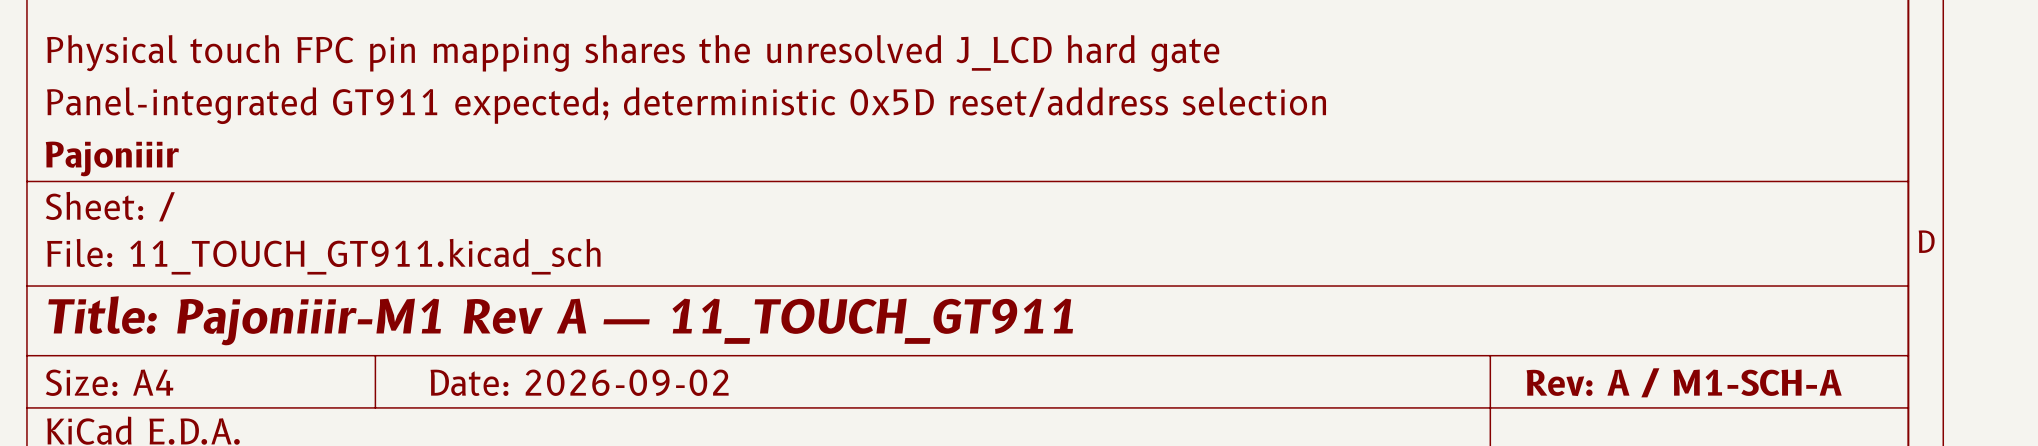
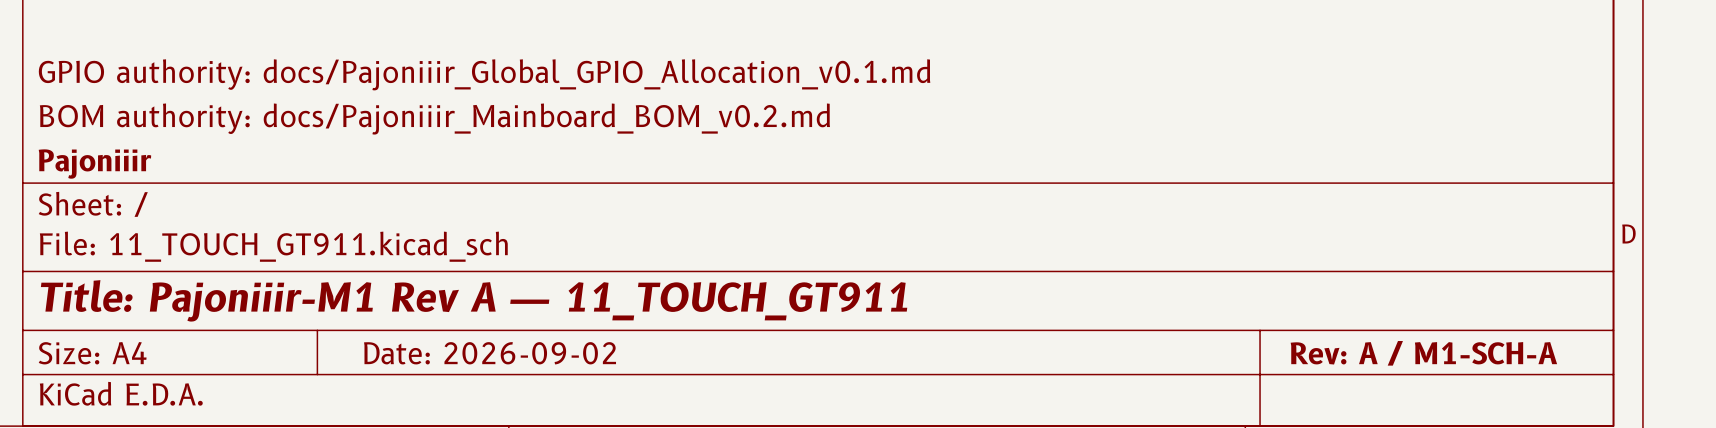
title block: Physical touch FPC pin mapping shares the unresolved J_LCD hard gate (633, 53) -> GPIO authority: docs/Pajoniiir_Global_GPIO_Allocation_v0.1.md (484, 74)
title block: Panel-integrated GT911 expected; deterministic 0x5D reset/address selection (686, 105) -> BOM authority: docs/Pajoniiir_Mainboard_BOM_v0.2.md (434, 119)

